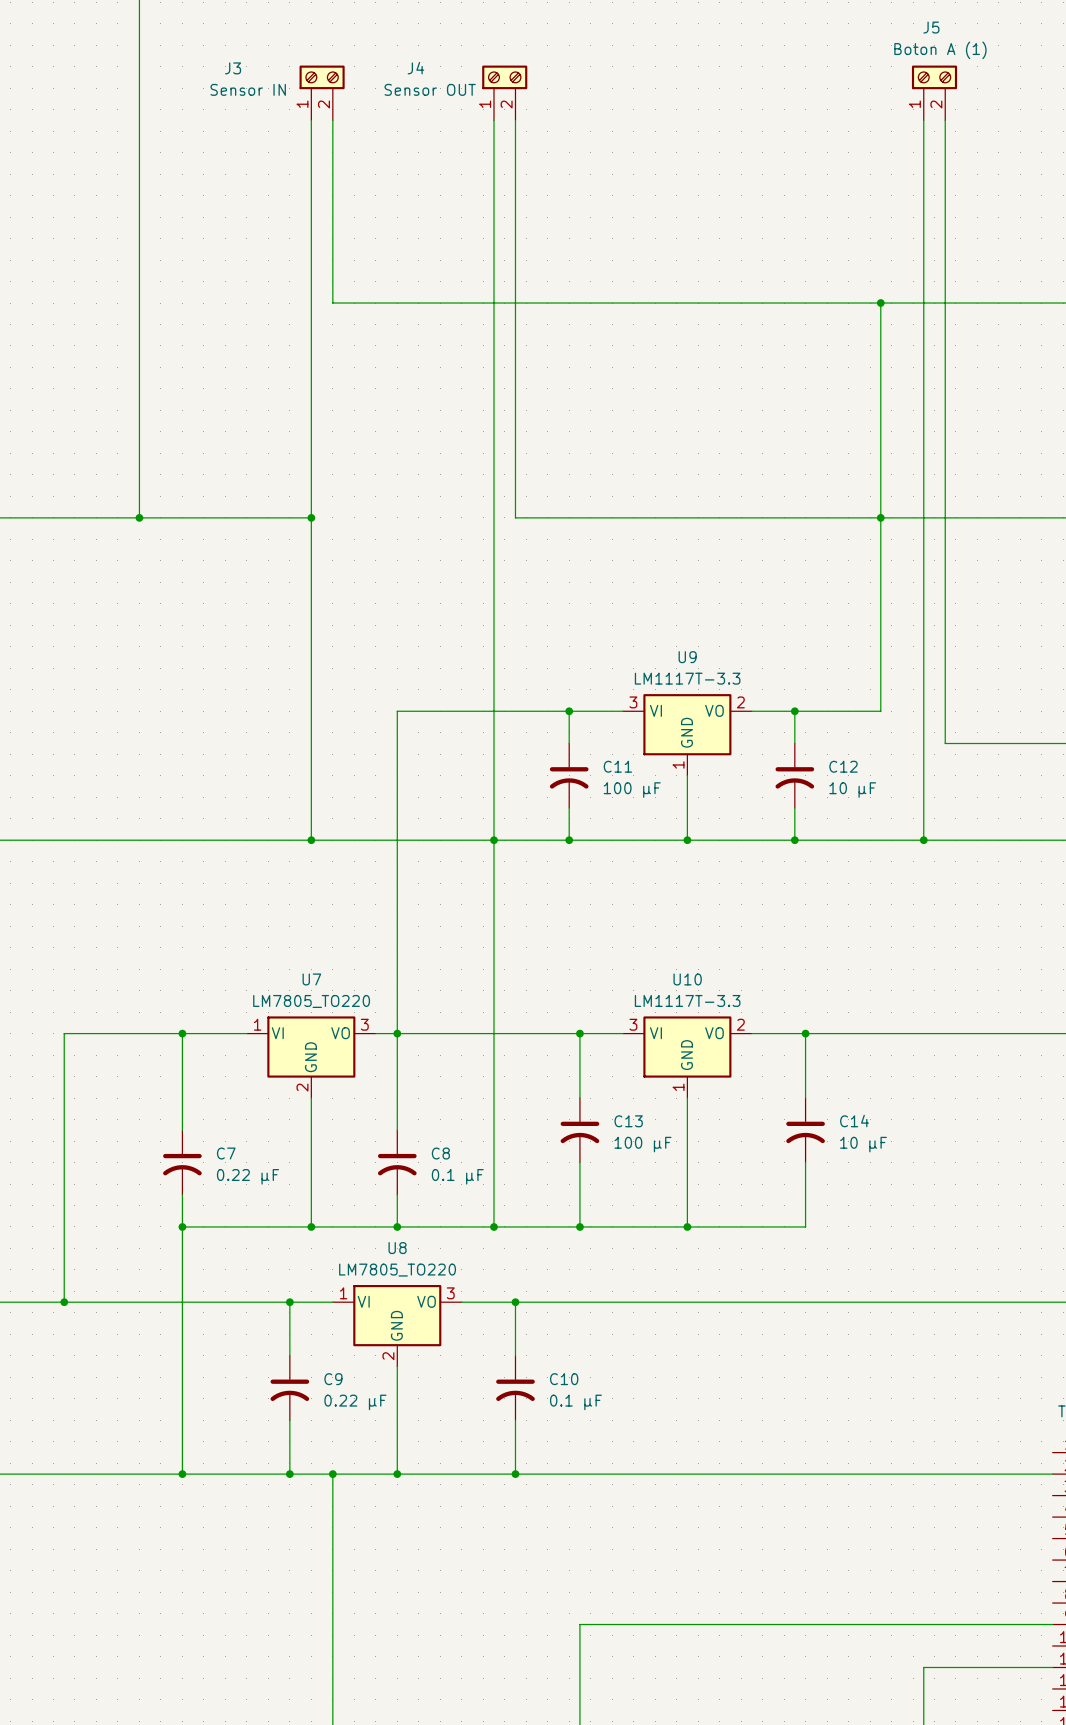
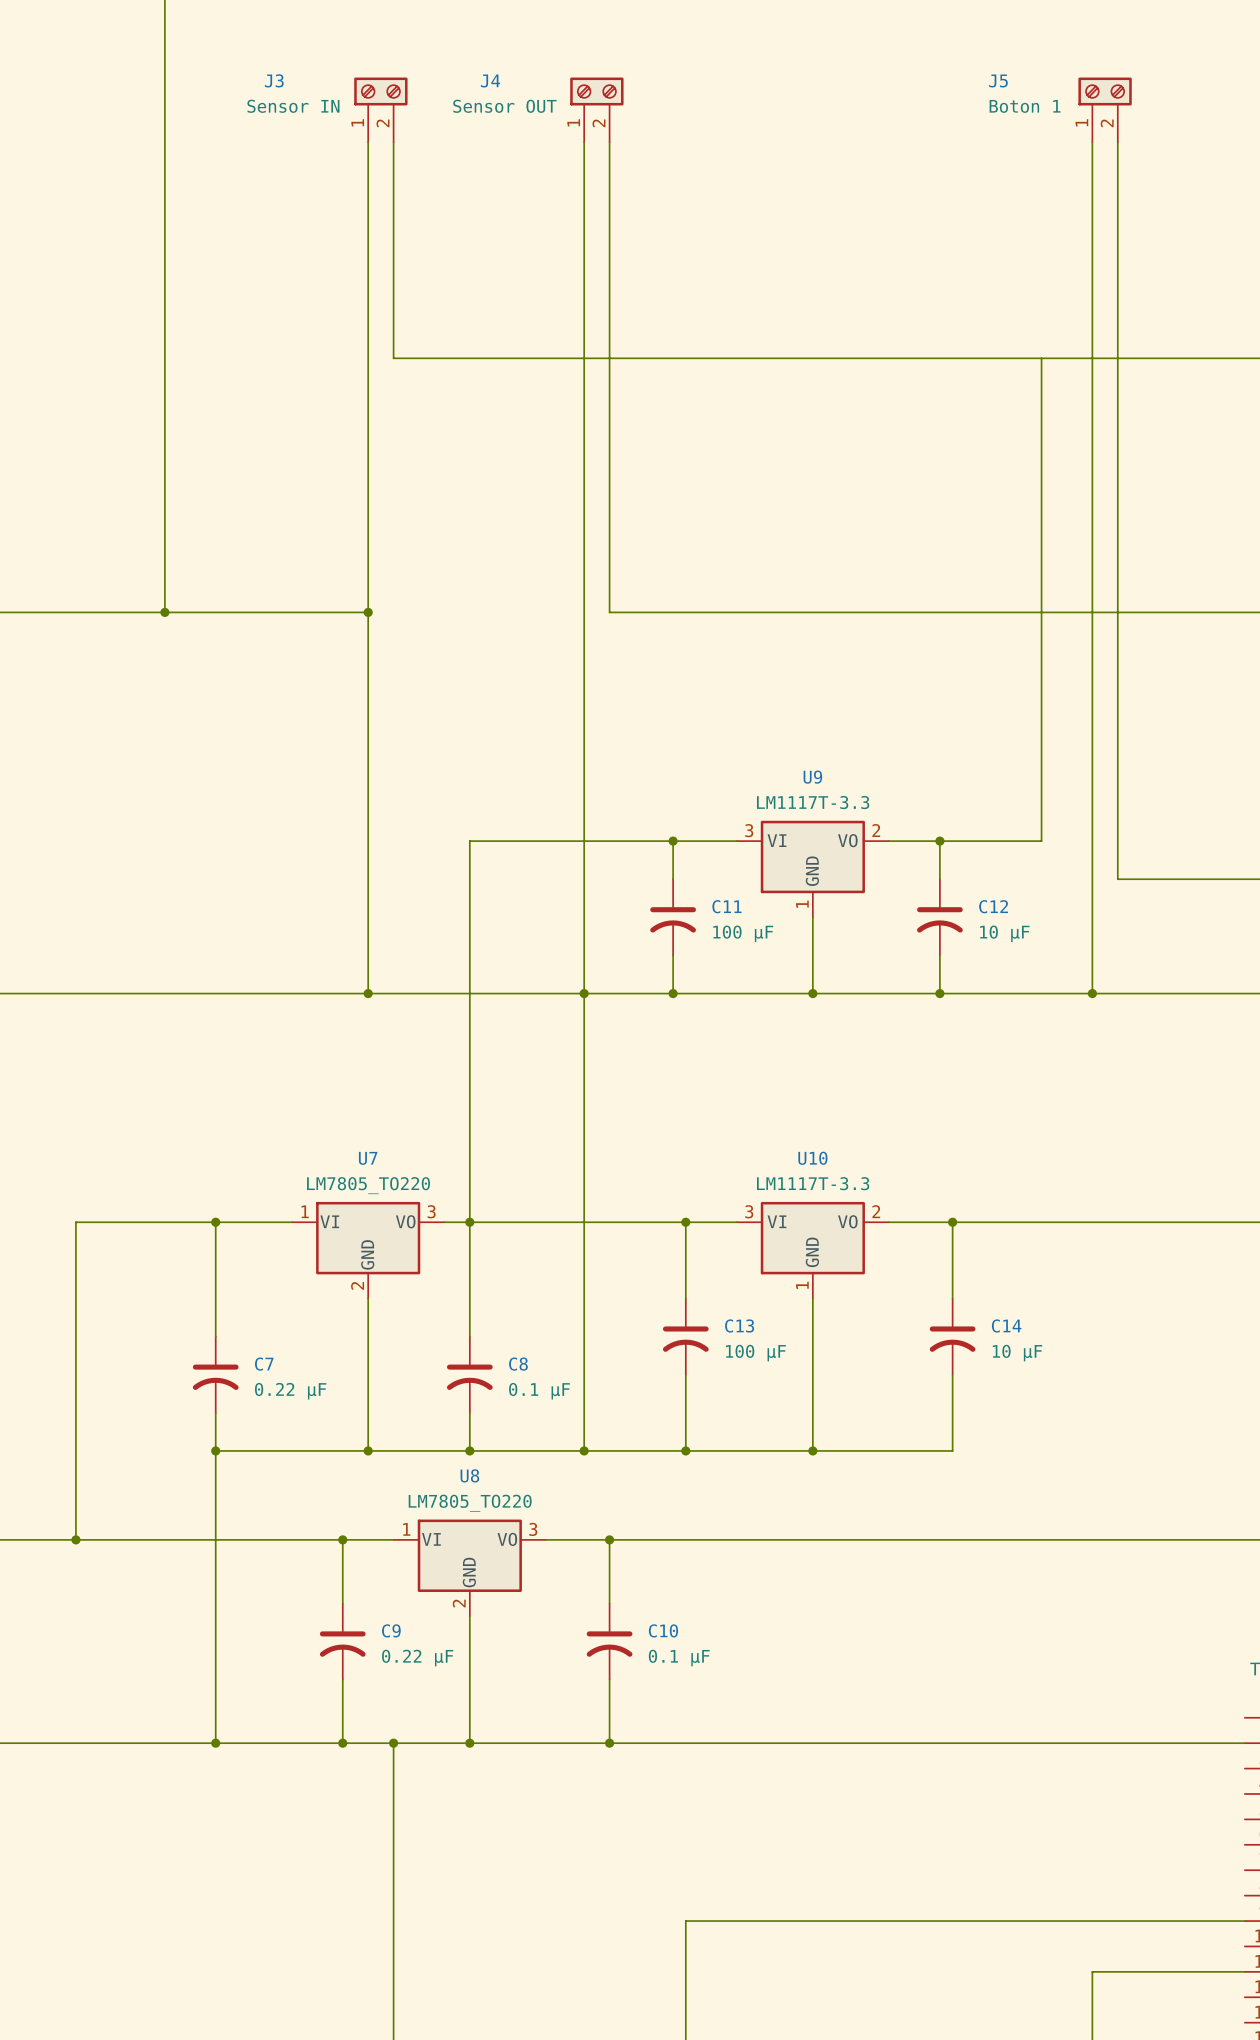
J5 name position: J5 (931, 27) -> J5 (998, 80)
J5 value: Boton A (1) (940, 50) -> Boton 1 (1025, 106)
junction: (880, 303) -> none
junction: (880, 517) -> none

